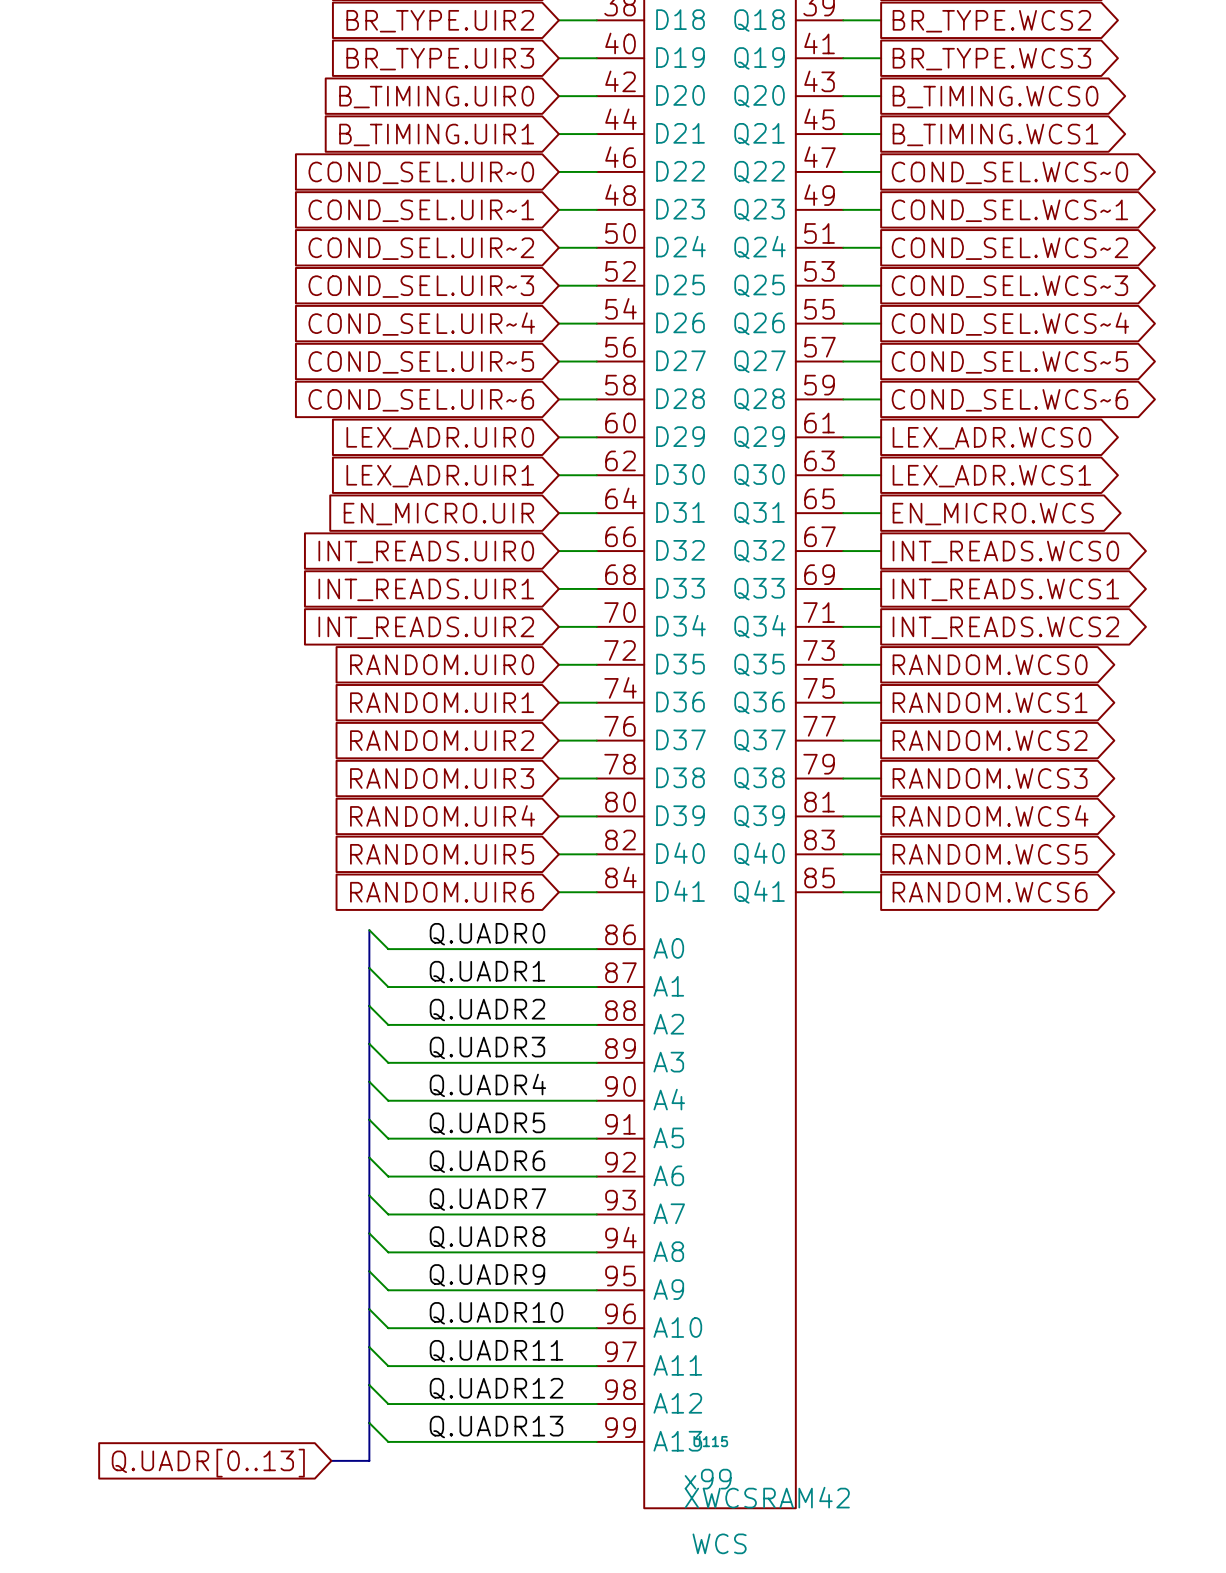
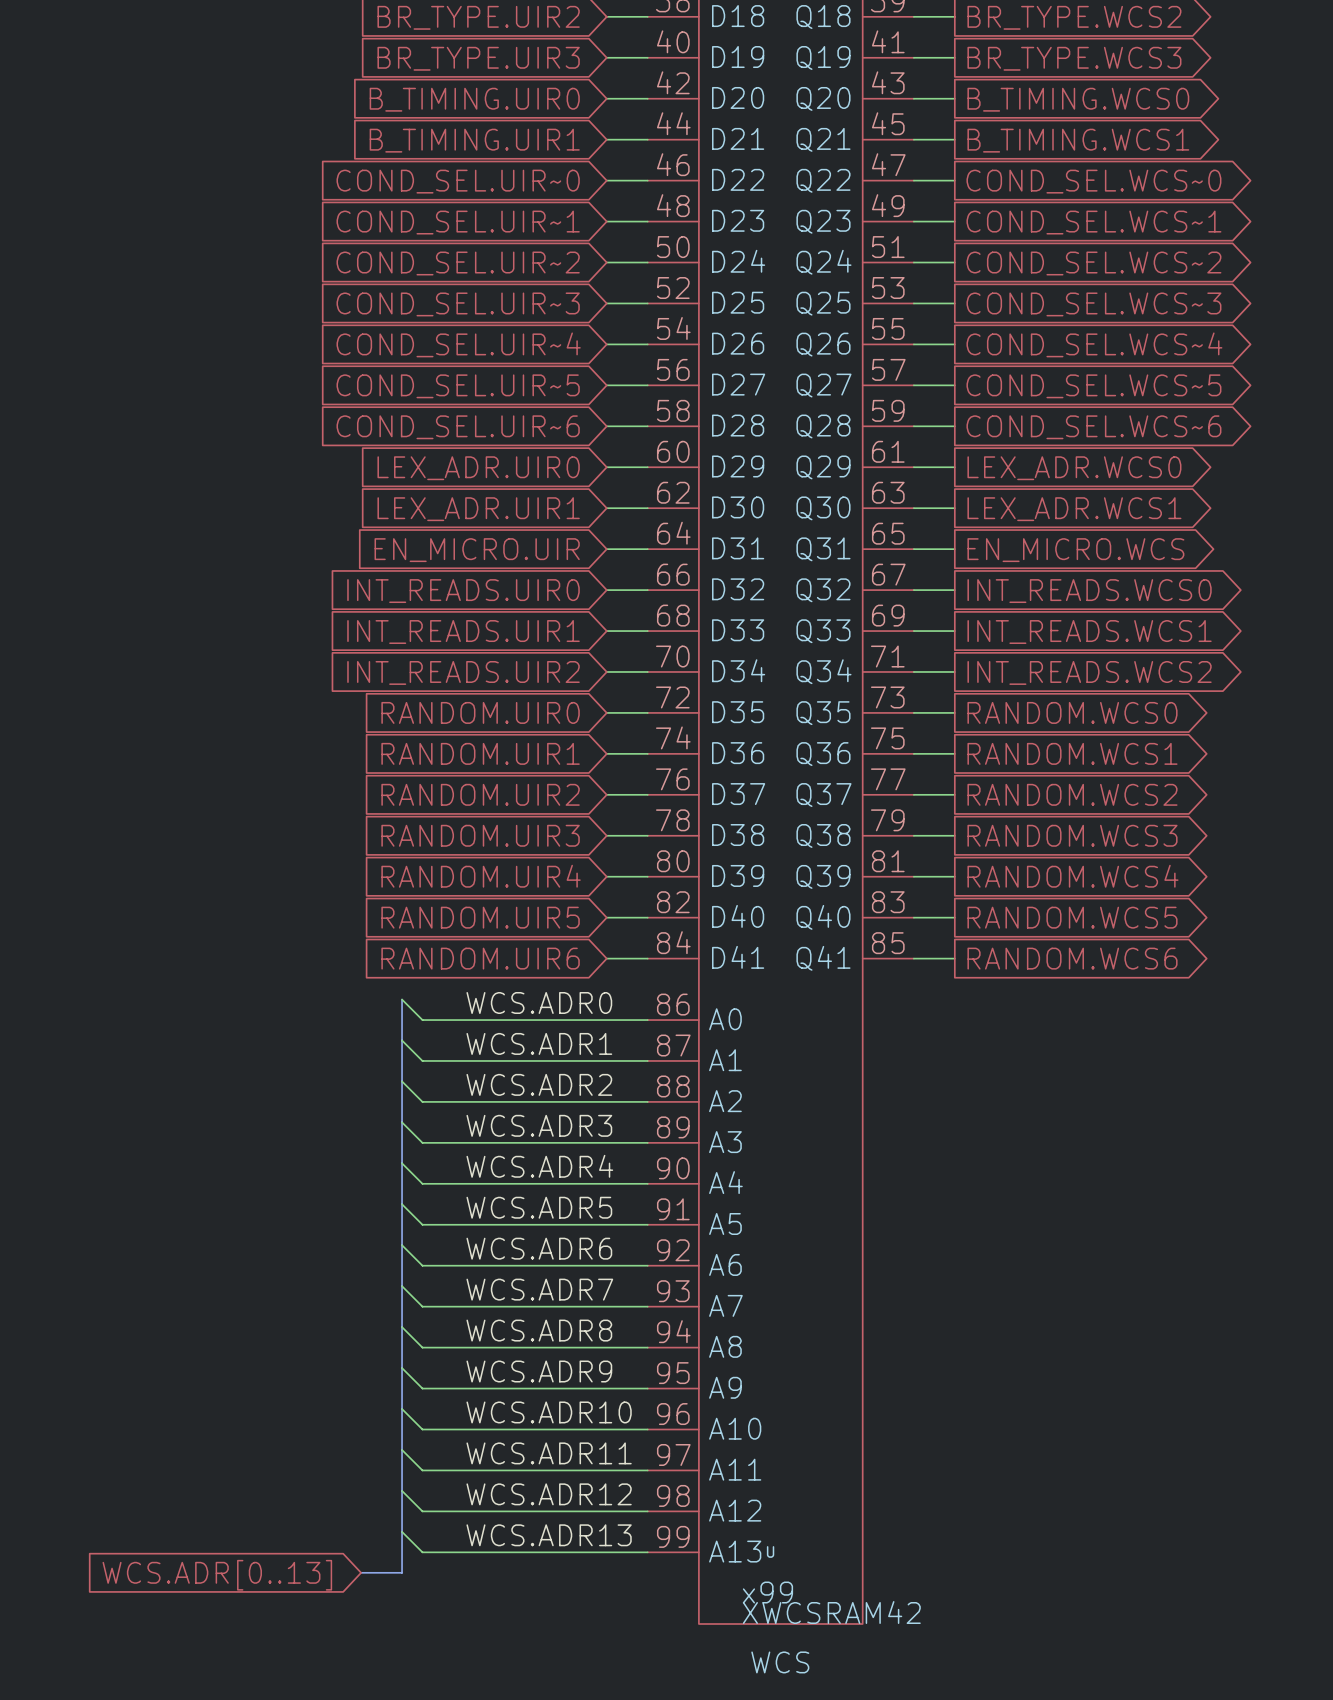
label: Q.UADR0 (487, 934) -> WCS.ADR0 (539, 1002)
label: Q.UADR1 (487, 972) -> WCS.ADR1 (539, 1043)
label: Q.UADR2 (487, 1010) -> WCS.ADR2 (539, 1084)
label: Q.UADR3 (487, 1047) -> WCS.ADR3 (539, 1125)
label: Q.UADR4 (487, 1085) -> WCS.ADR4 (539, 1166)
label: Q.UADR5 (487, 1123) -> WCS.ADR5 (539, 1207)
label: Q.UADR6 (487, 1161) -> WCS.ADR6 (539, 1248)
label: Q.UADR7 (487, 1199) -> WCS.ADR7 (539, 1289)
label: Q.UADR8 (487, 1237) -> WCS.ADR8 (539, 1330)
label: Q.UADR9 (487, 1275) -> WCS.ADR9 (539, 1371)
label: Q.UADR10 (496, 1313) -> WCS.ADR10 (549, 1412)
label: Q.UADR11 (496, 1351) -> WCS.ADR11 (549, 1453)
label: Q.UADR12 (496, 1389) -> WCS.ADR12 (549, 1494)
label: Q.UADR13 (496, 1427) -> WCS.ADR13 (549, 1535)
U115 name: U115 (710, 1441) -> U (770, 1551)
global label: Q.UADR[0..13] (208, 1463) -> WCS.ADR[0..13] (217, 1575)

